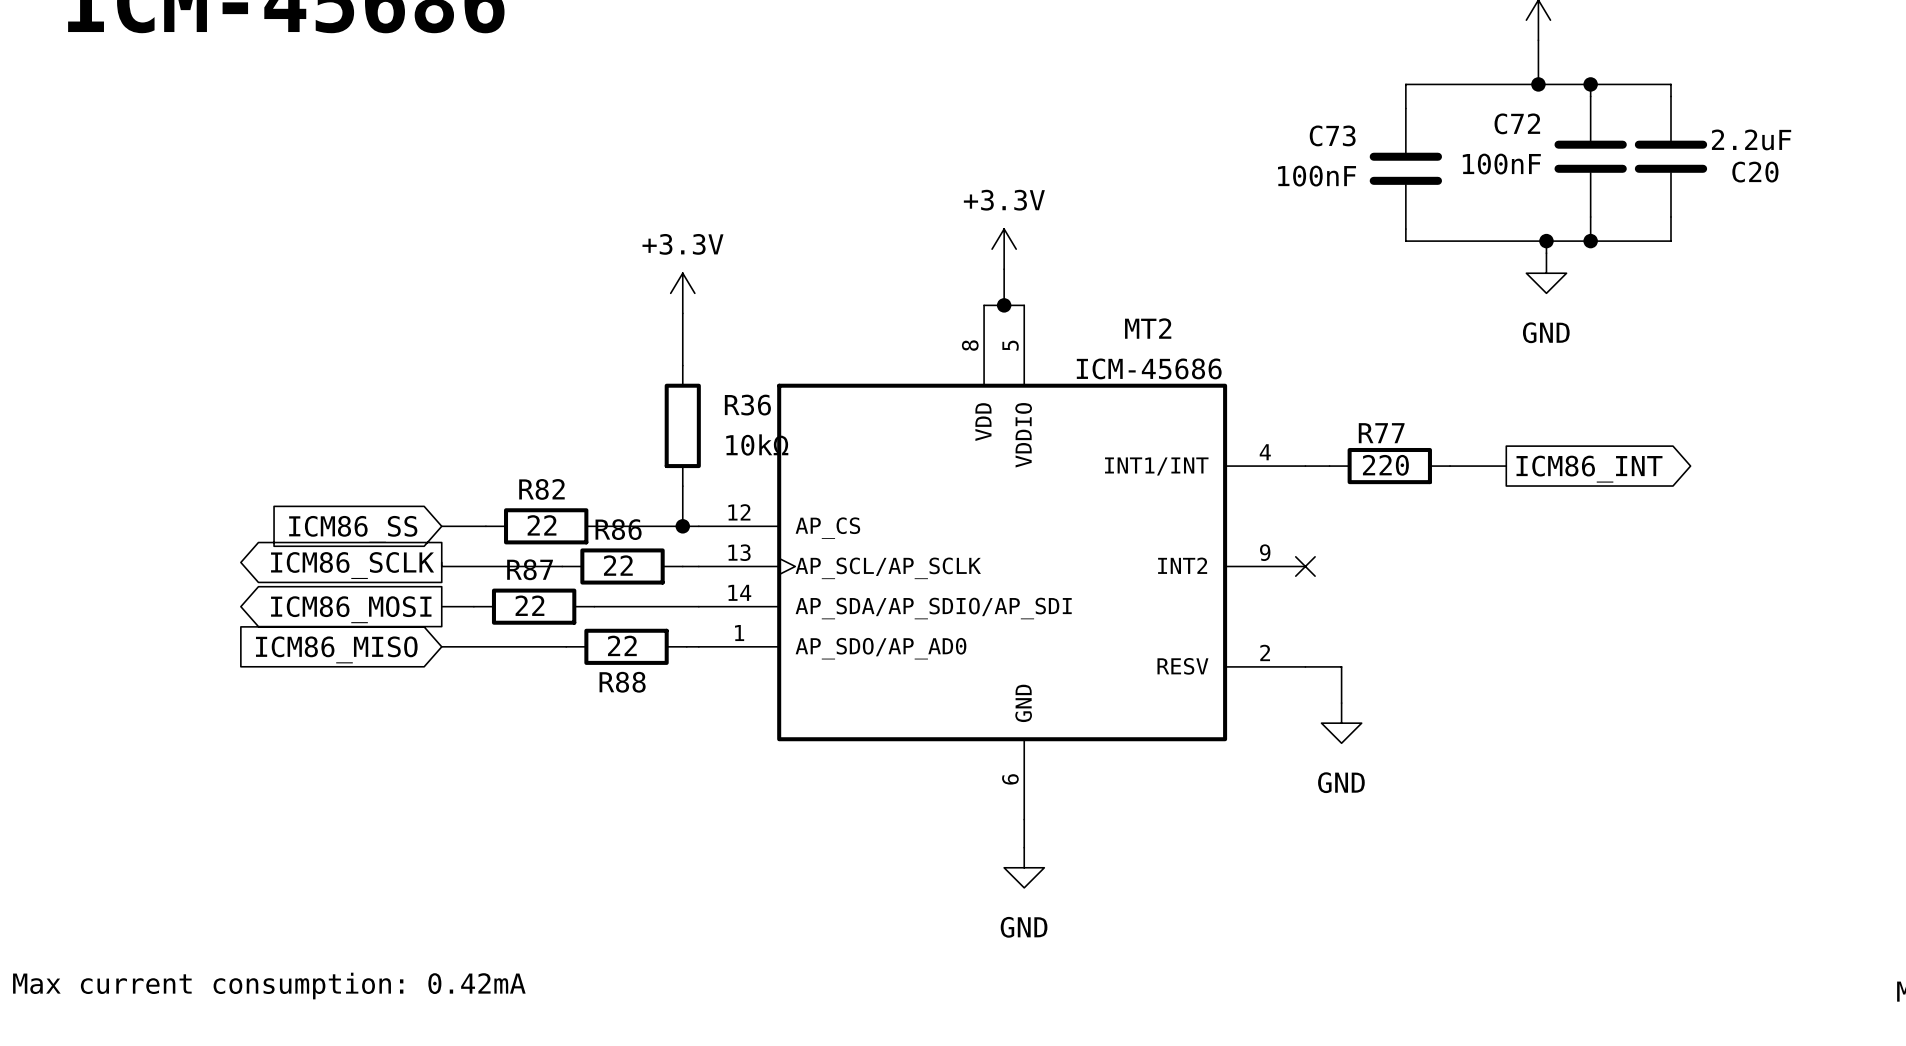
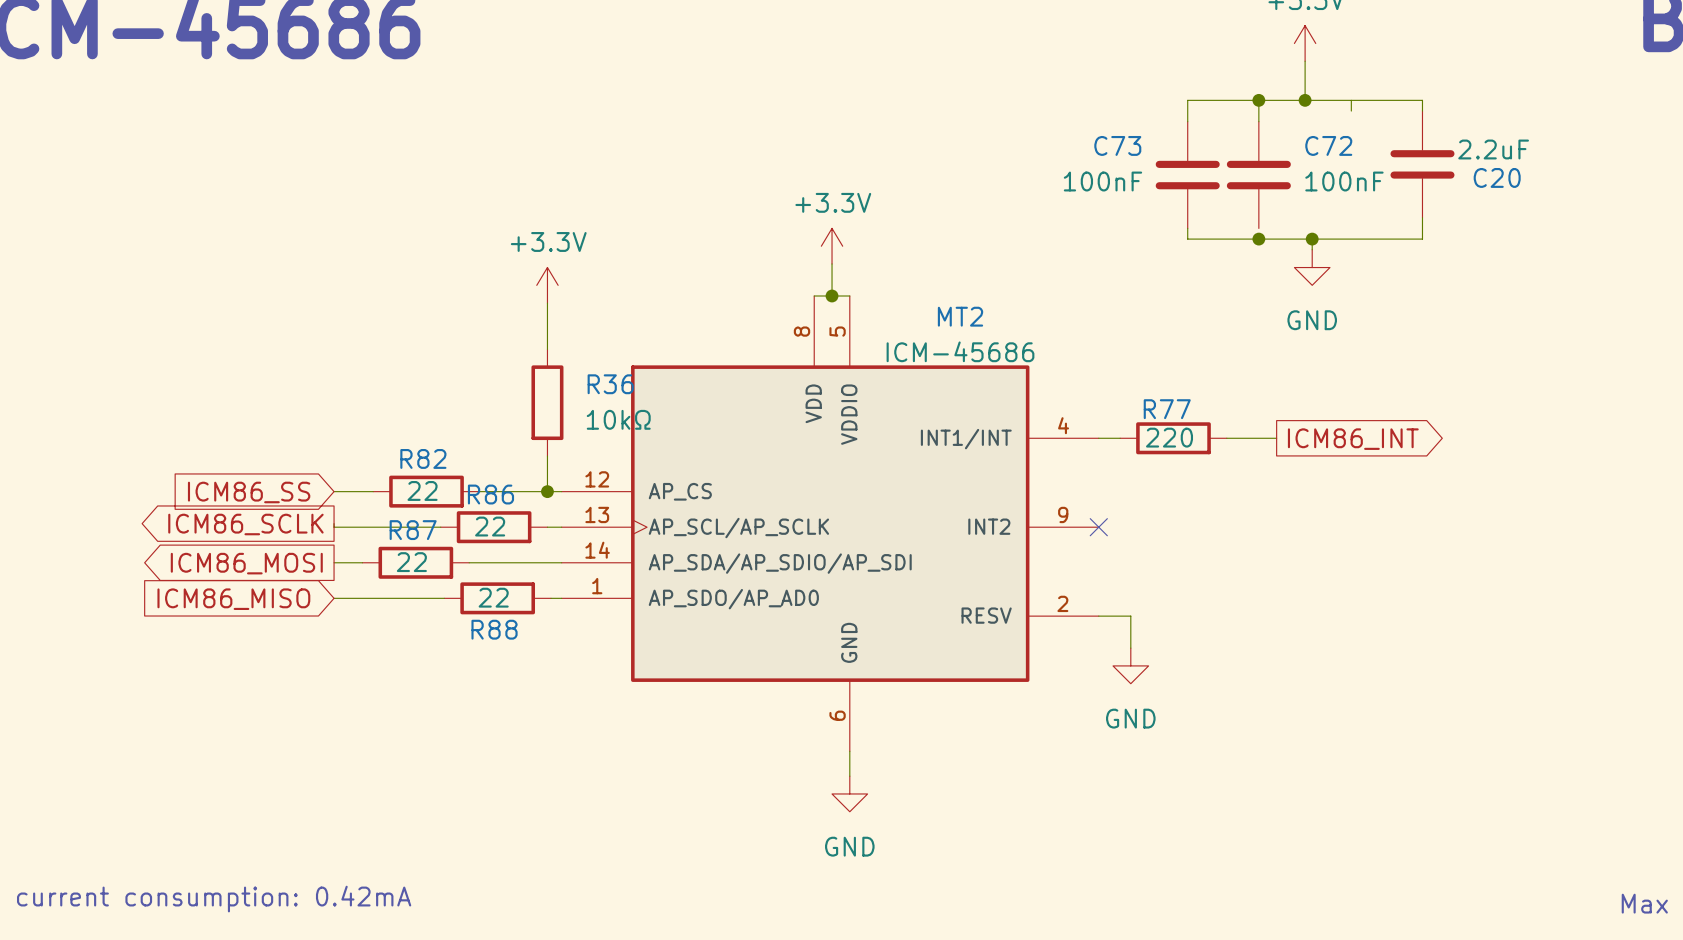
junction: none -> (1258, 100)
junction: (1590, 84) -> none
C72 name position: C72 (1517, 123) -> C72 (1328, 145)
C72 position: (1590, 156) -> (1258, 175)
C72 value position: 100nF (1501, 164) -> 100nF (1344, 181)
wire: (1590, 217) (1590, 241) -> (1258, 100) (1258, 121)
junction: none -> (1258, 239)
junction: (1590, 241) -> none

